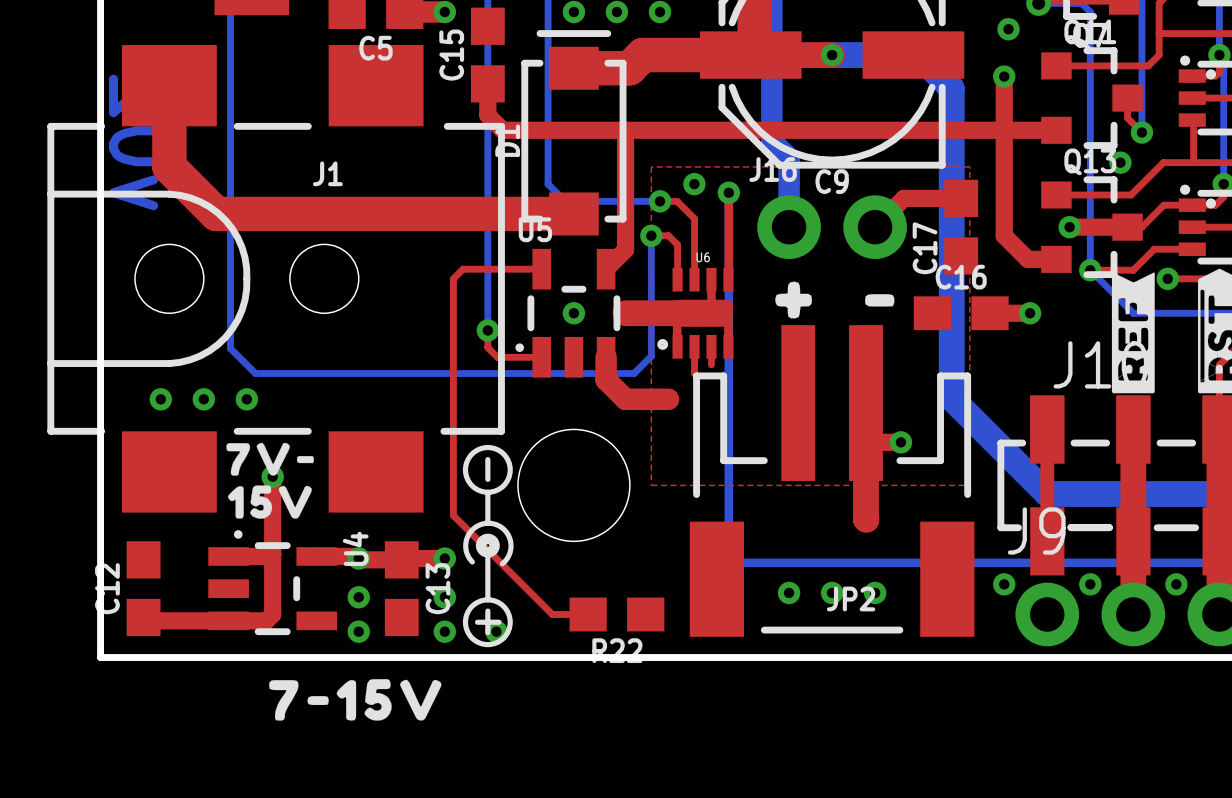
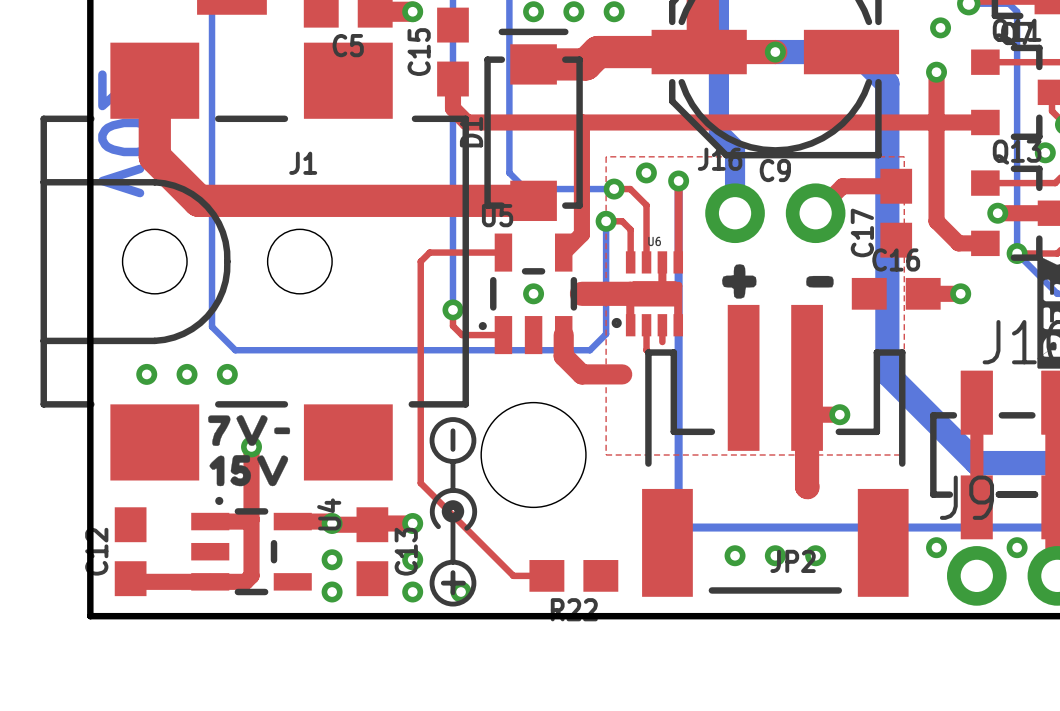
drawing: [269, 679, 442, 721] -> none

